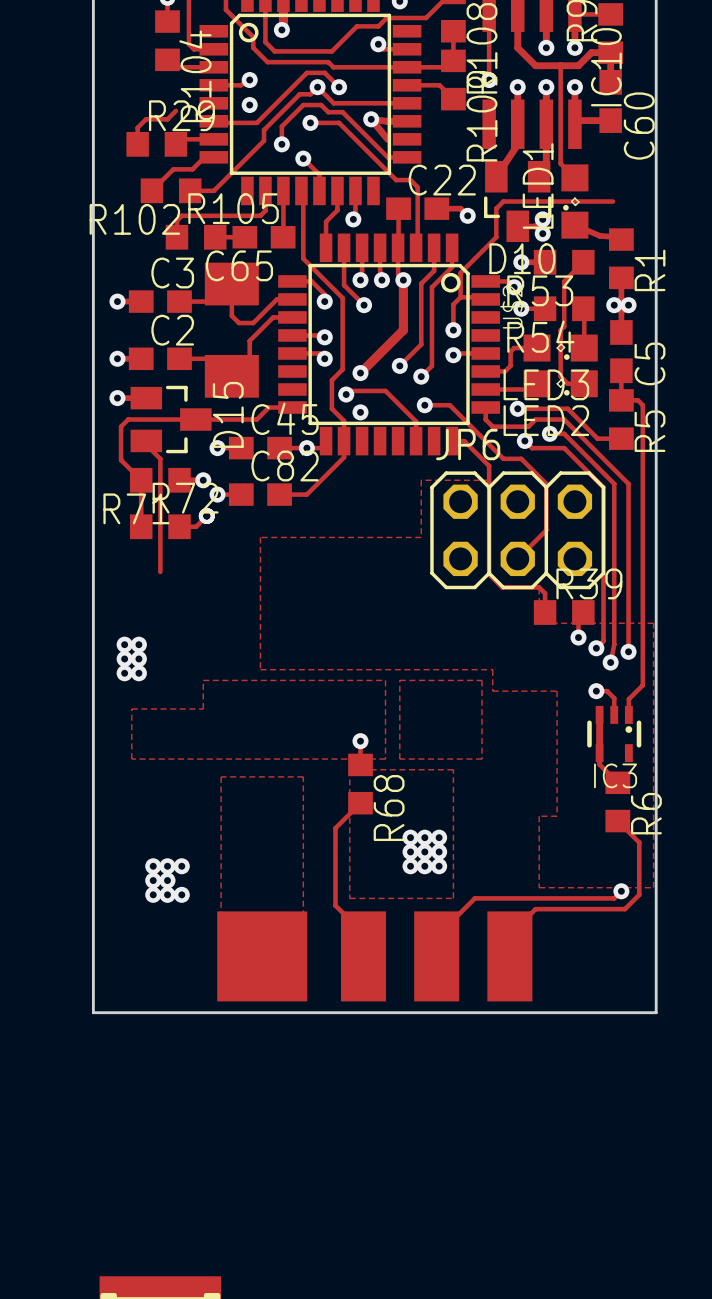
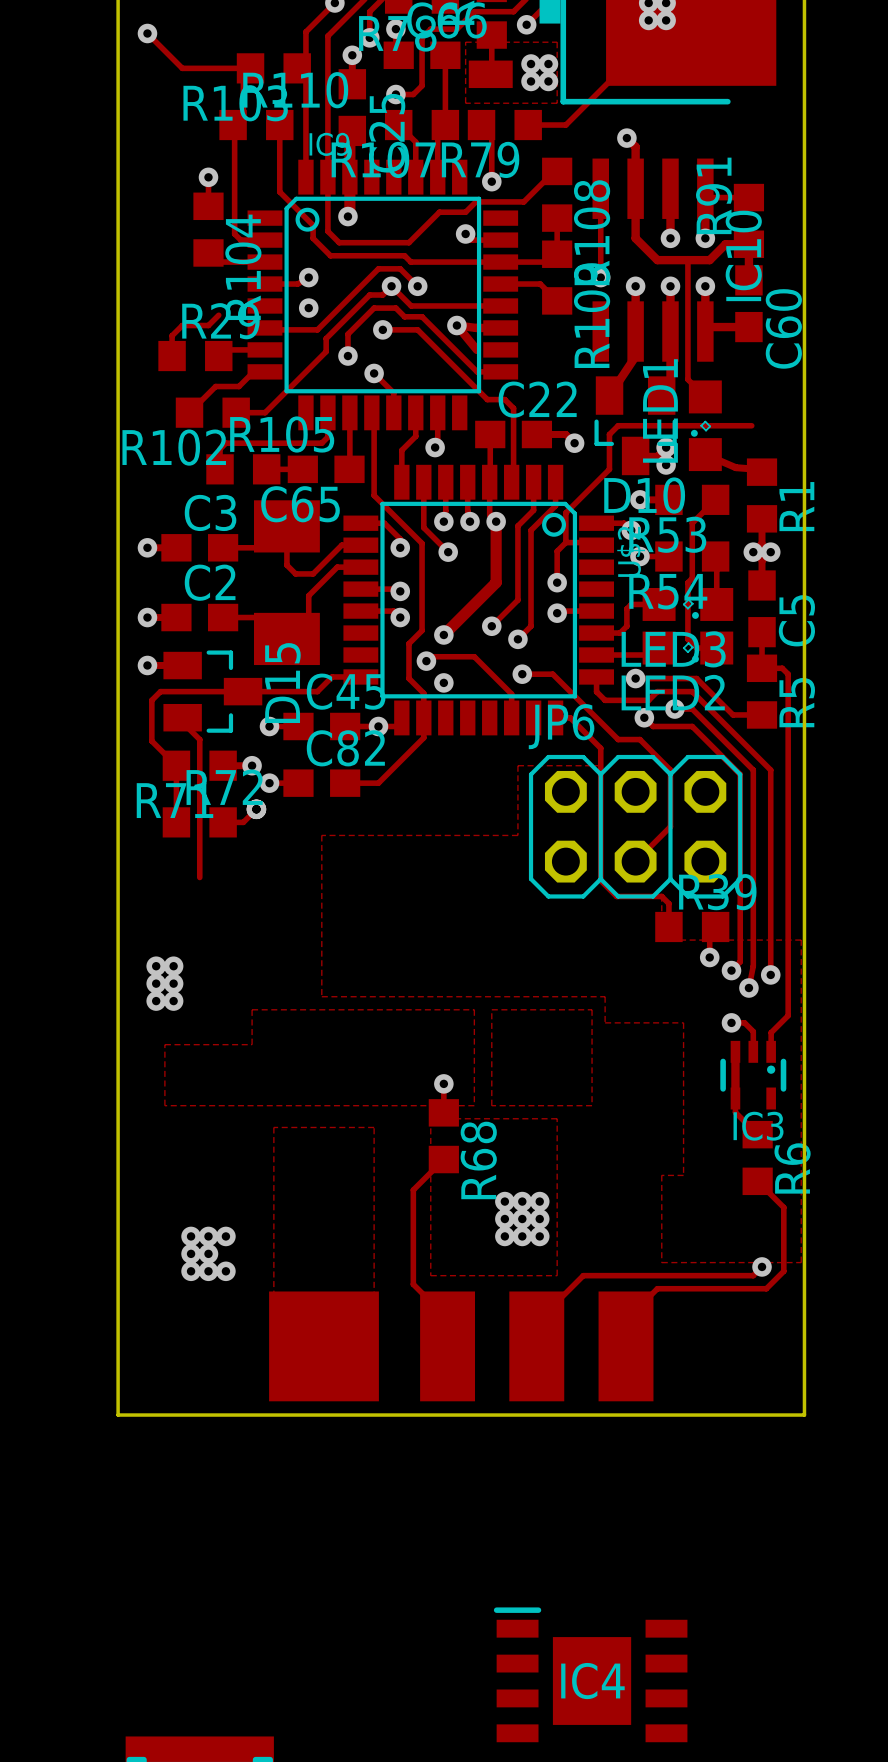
IC4: none -> (590, 1674)

